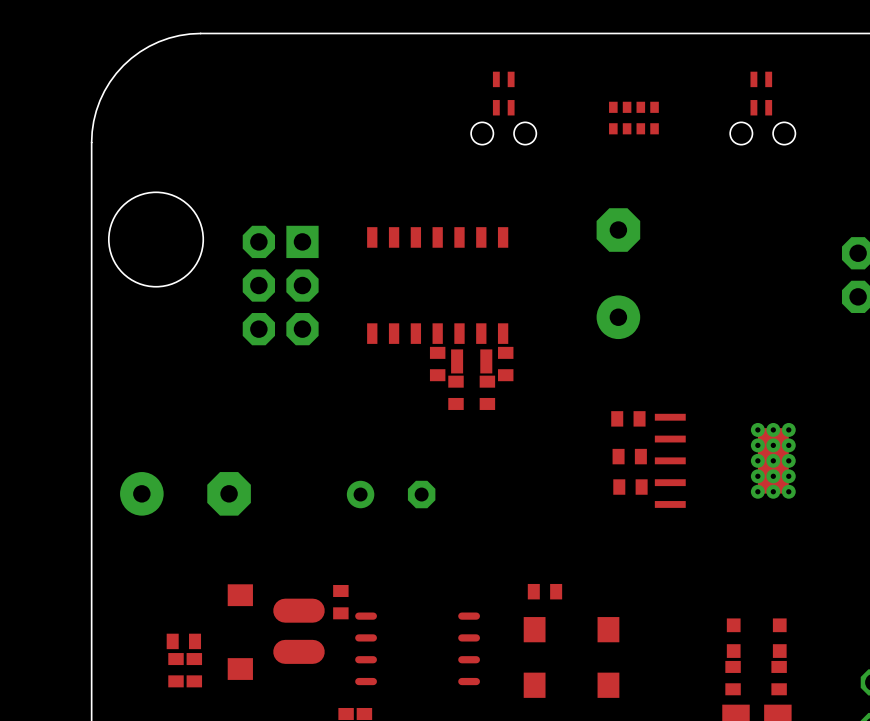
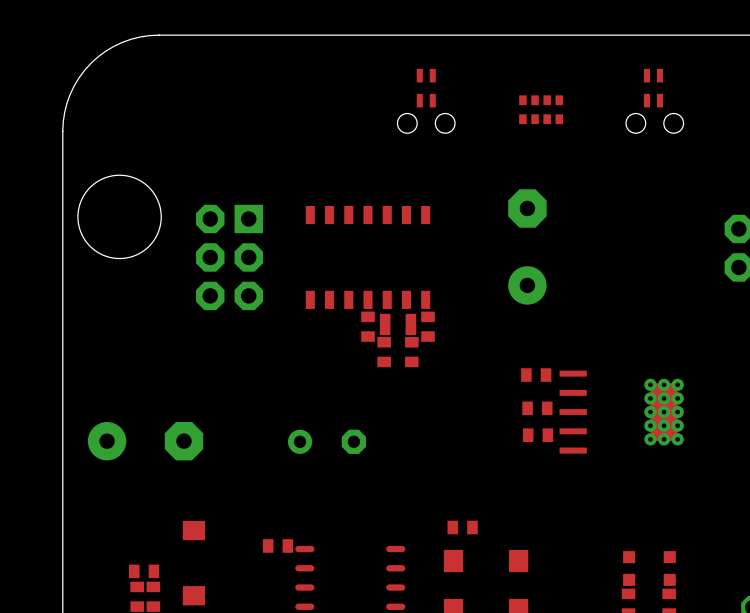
part rotation: 0° (340, 602) -> 90° clockwise (277, 545)
part: (298, 631) -> none

